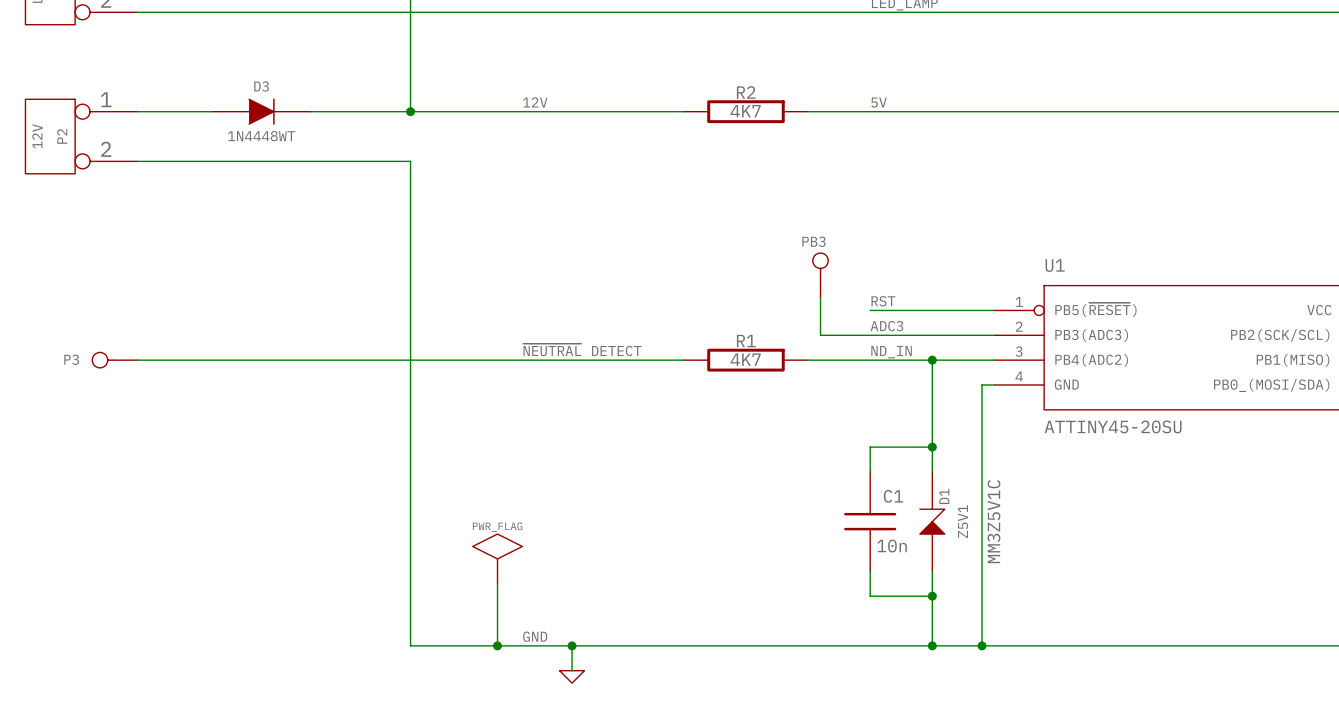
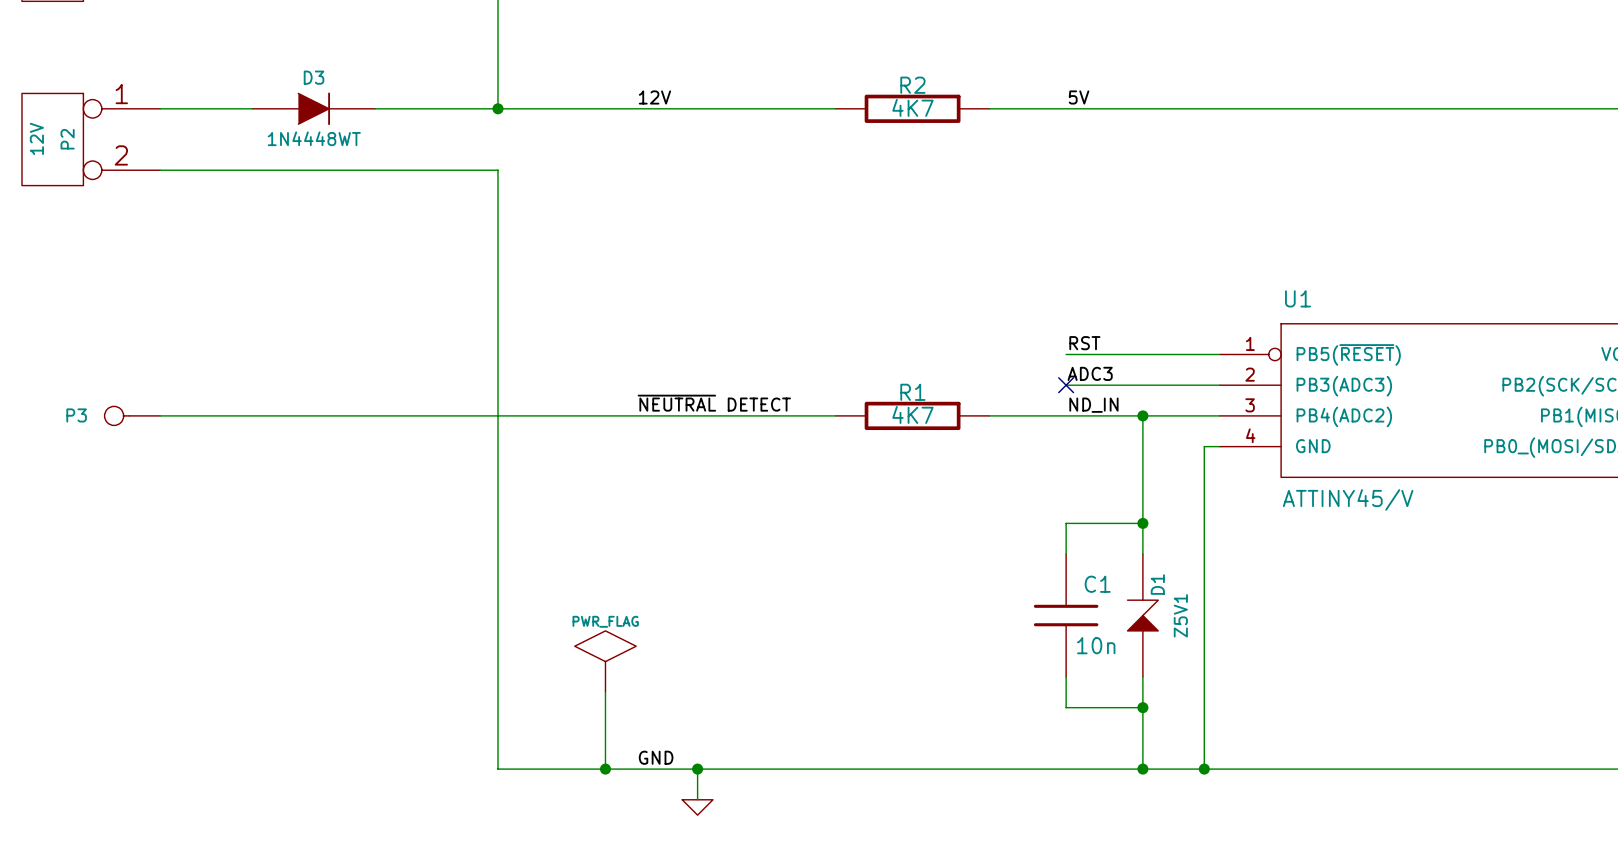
PB3: (820, 275) -> none
wire: (820, 298) (820, 335) (870, 335) -> none
no-connect mark: none -> (1066, 385)
U1 value: ATTINY45-20SU (1113, 426) -> ATTINY45/V (1348, 499)
D1 text: MM3Z5V1C (993, 521) -> none

